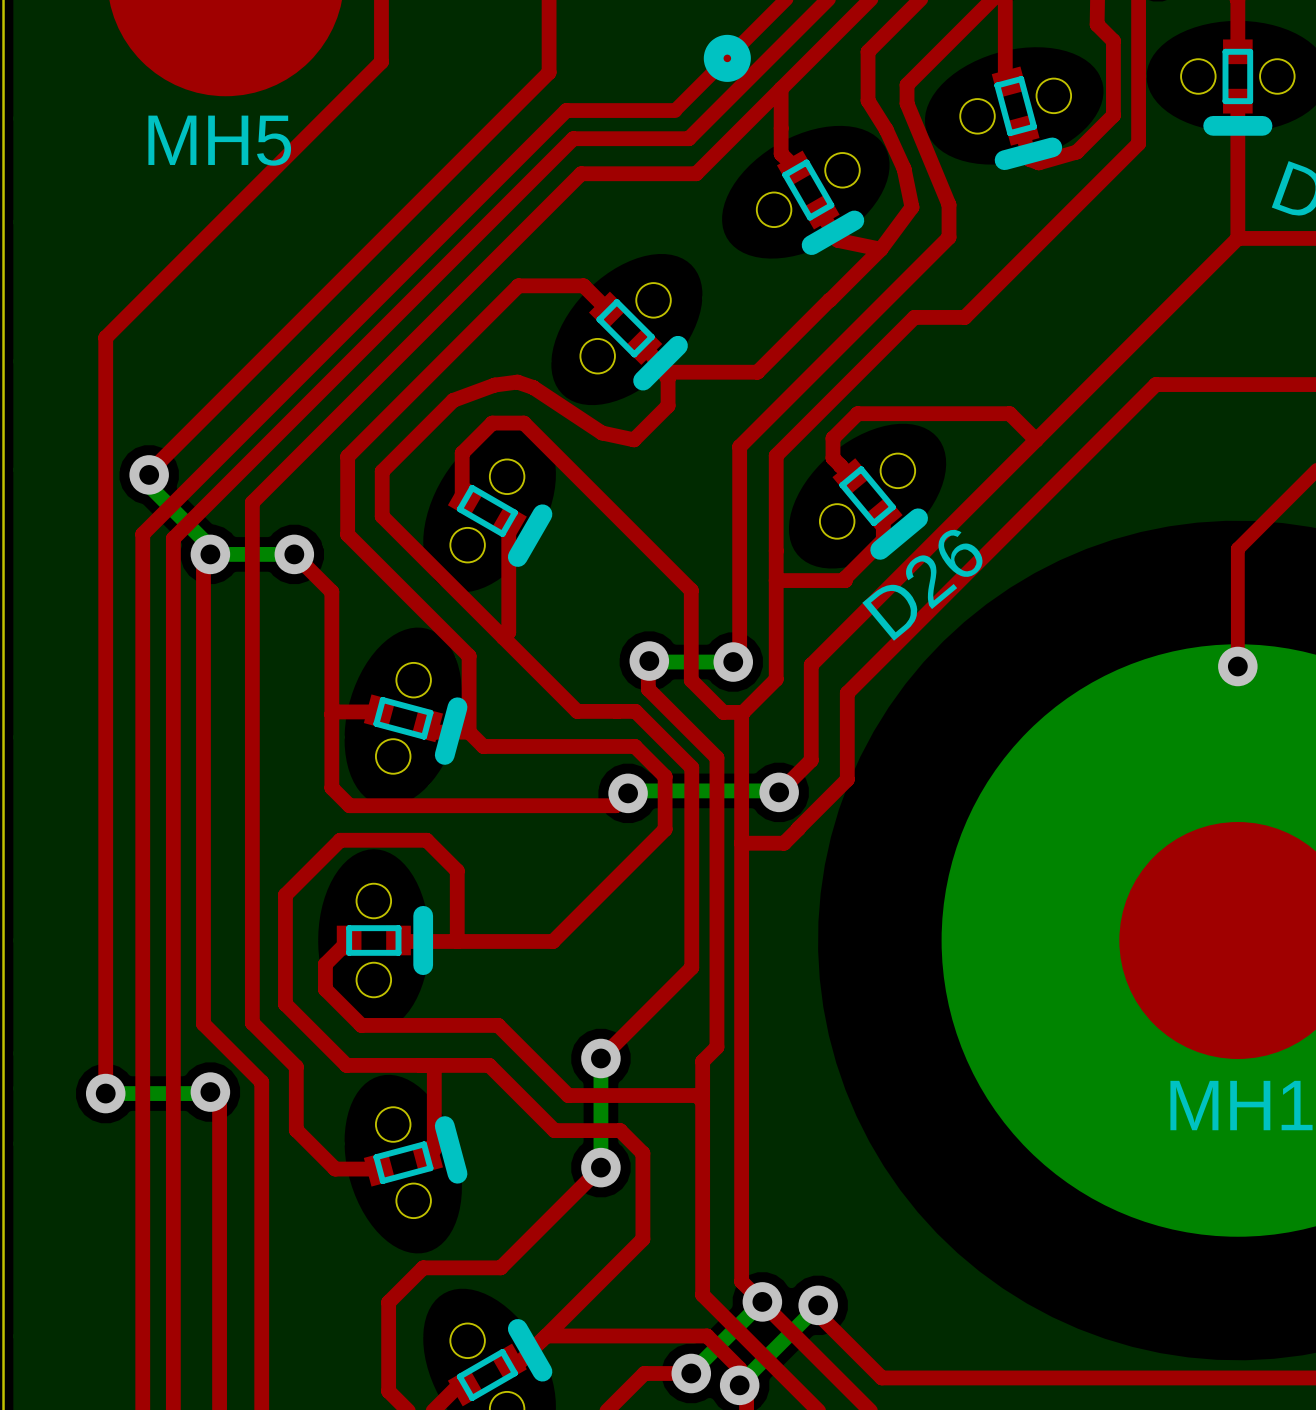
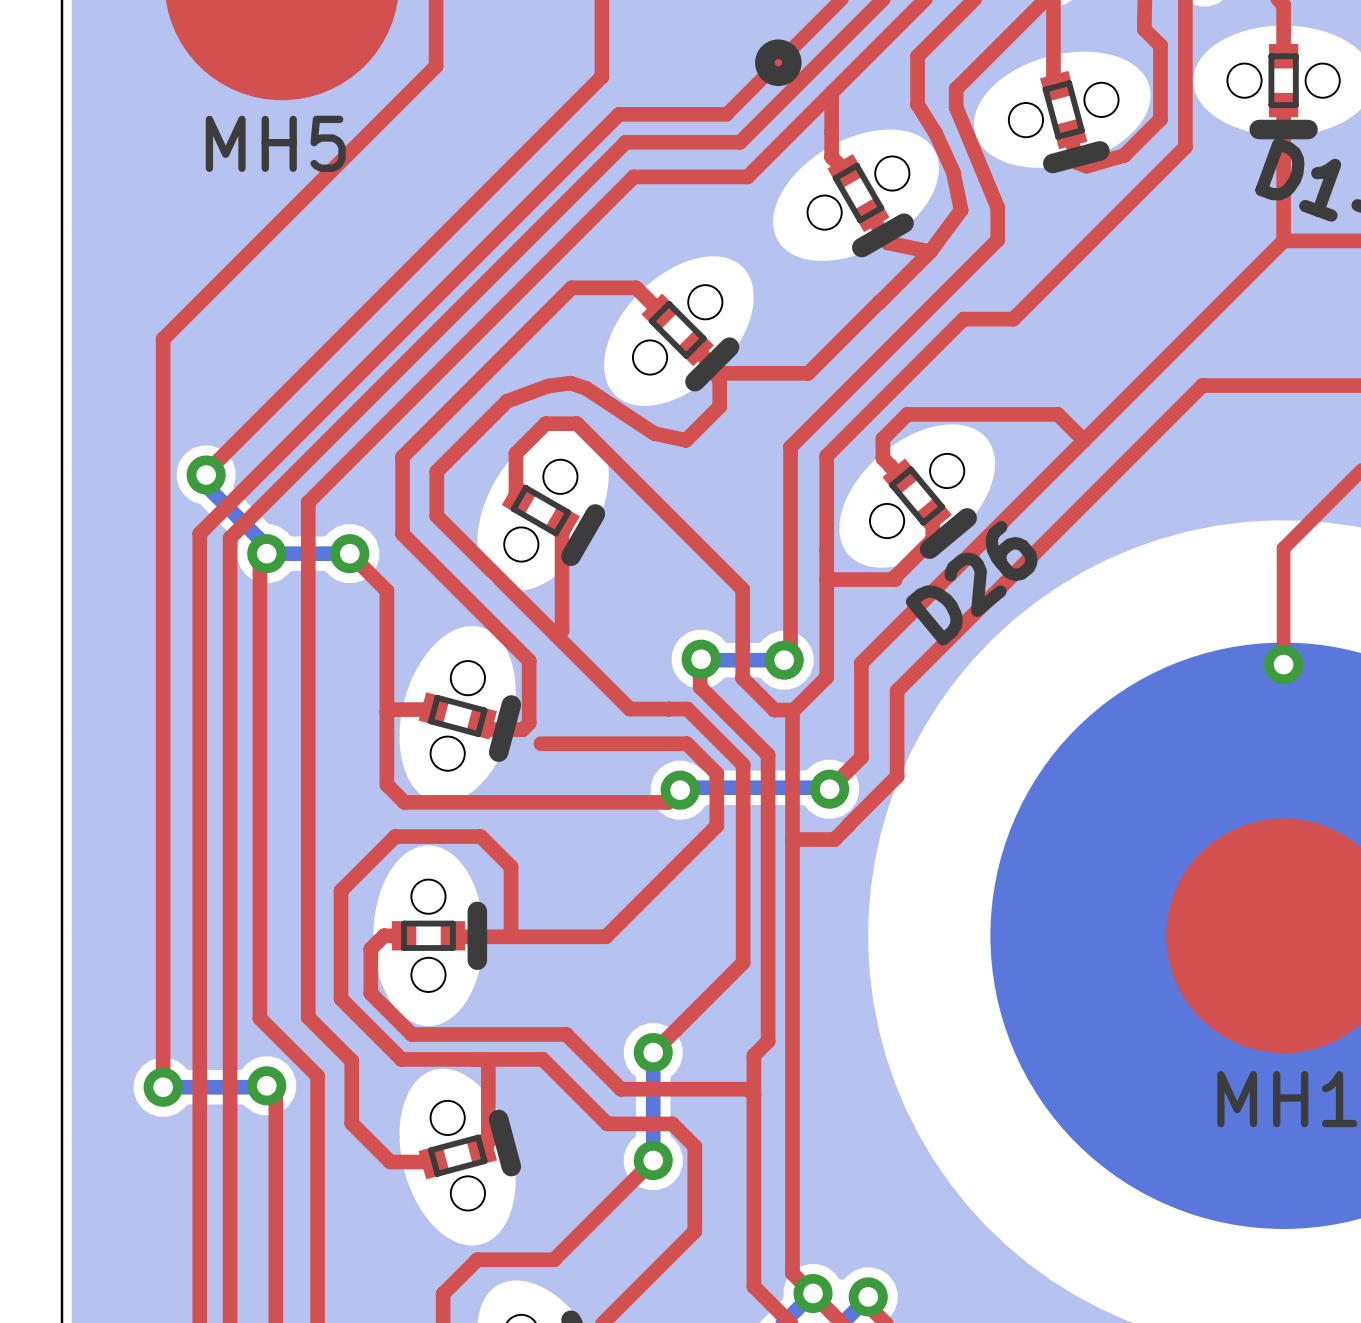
top track: (469, 656) (469, 732) (483, 746) (487, 746) -> (522, 654) (529, 660) (529, 723) (522, 729)
top track: (349, 940) (325, 964) (325, 989) (361, 1025) (498, 1025) (513, 1040) -> (404, 935) (384, 935) (370, 948) (370, 993) (411, 1034) (566, 1034)

